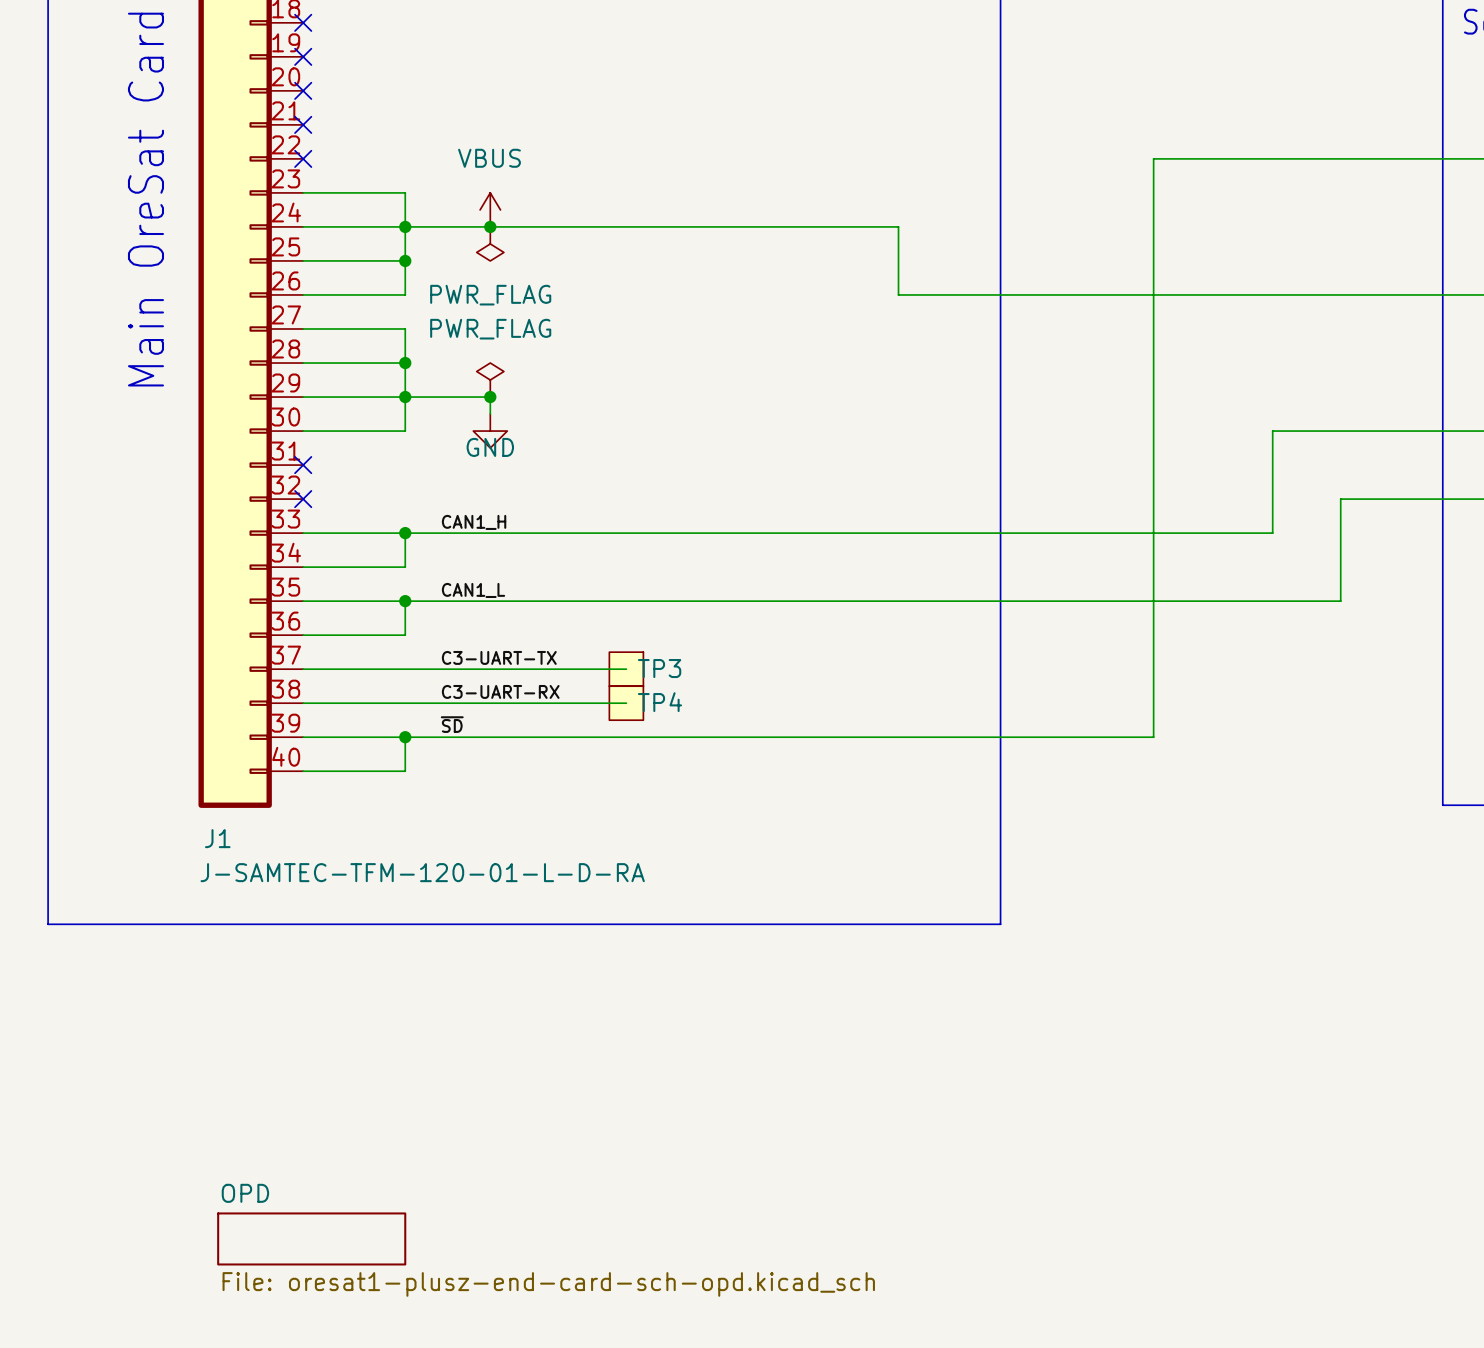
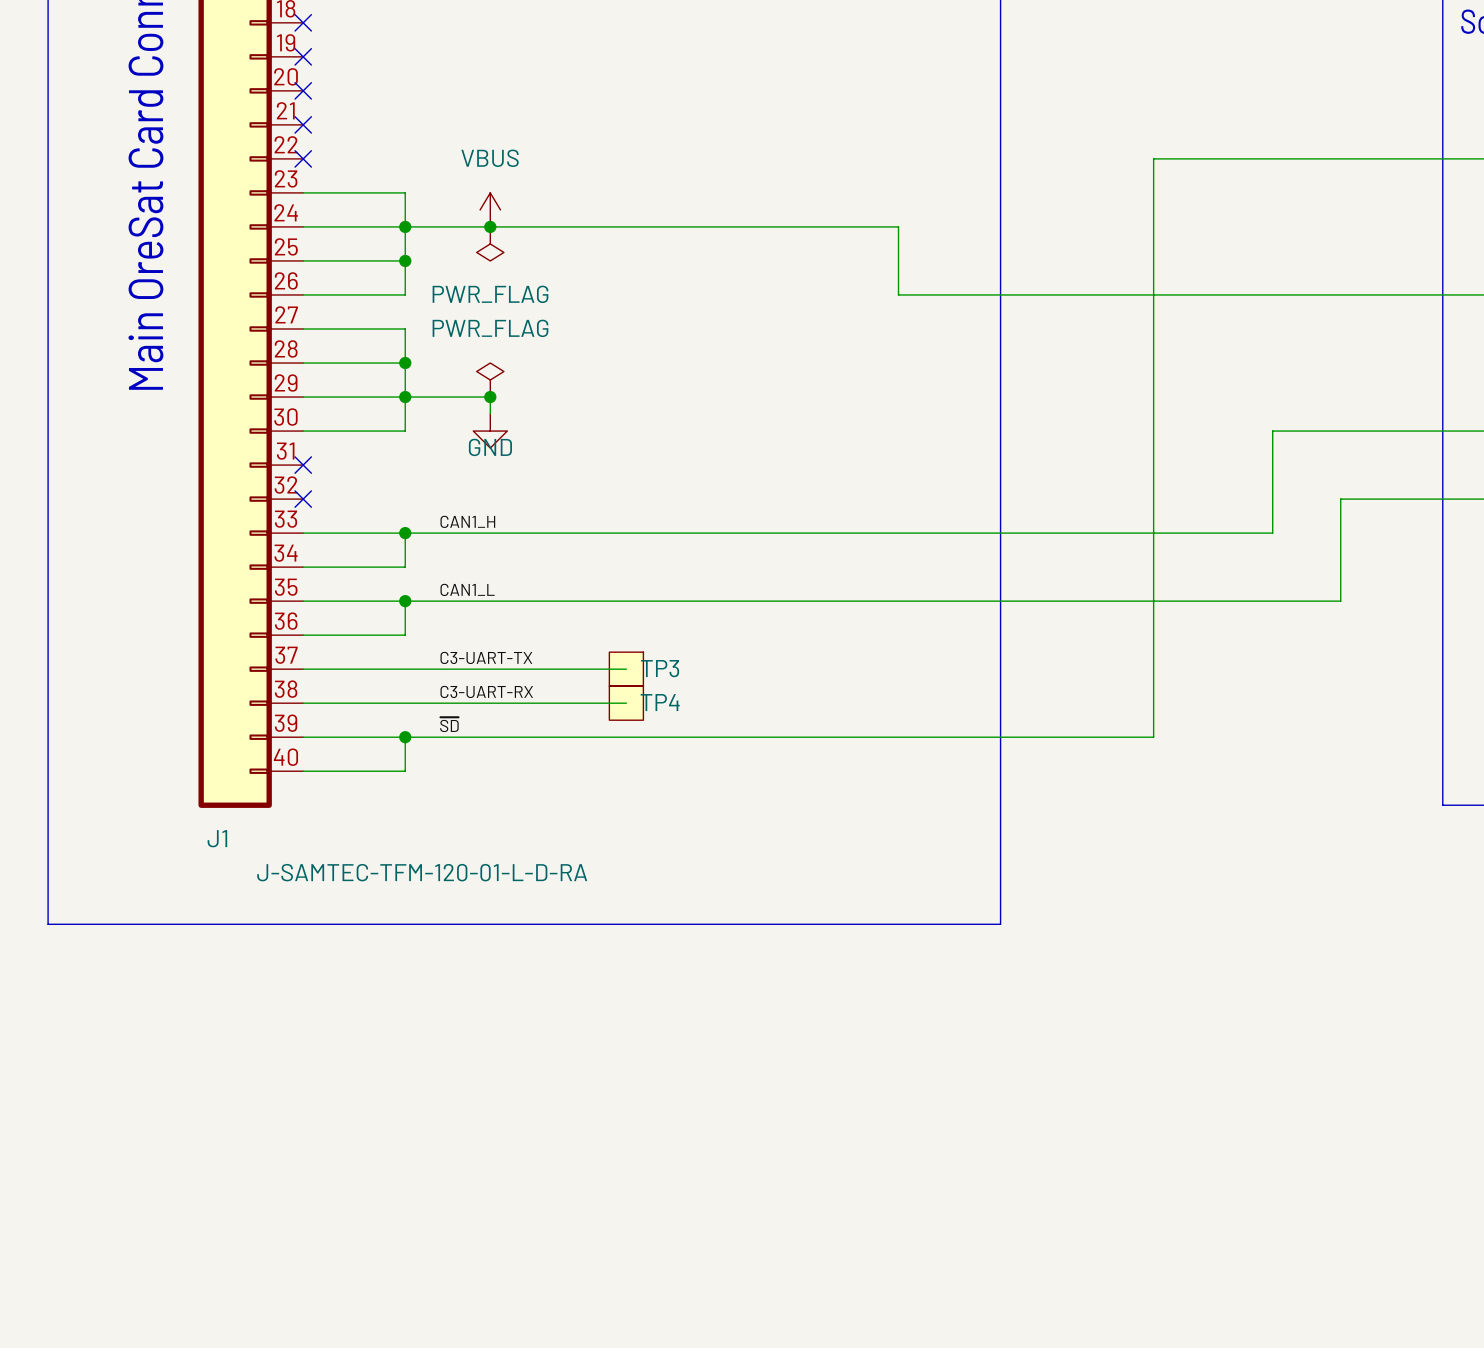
sheet OPD: File: oresat1-plusz-end-card-sch-opd.kicad_sch (311, 1238) -> none

